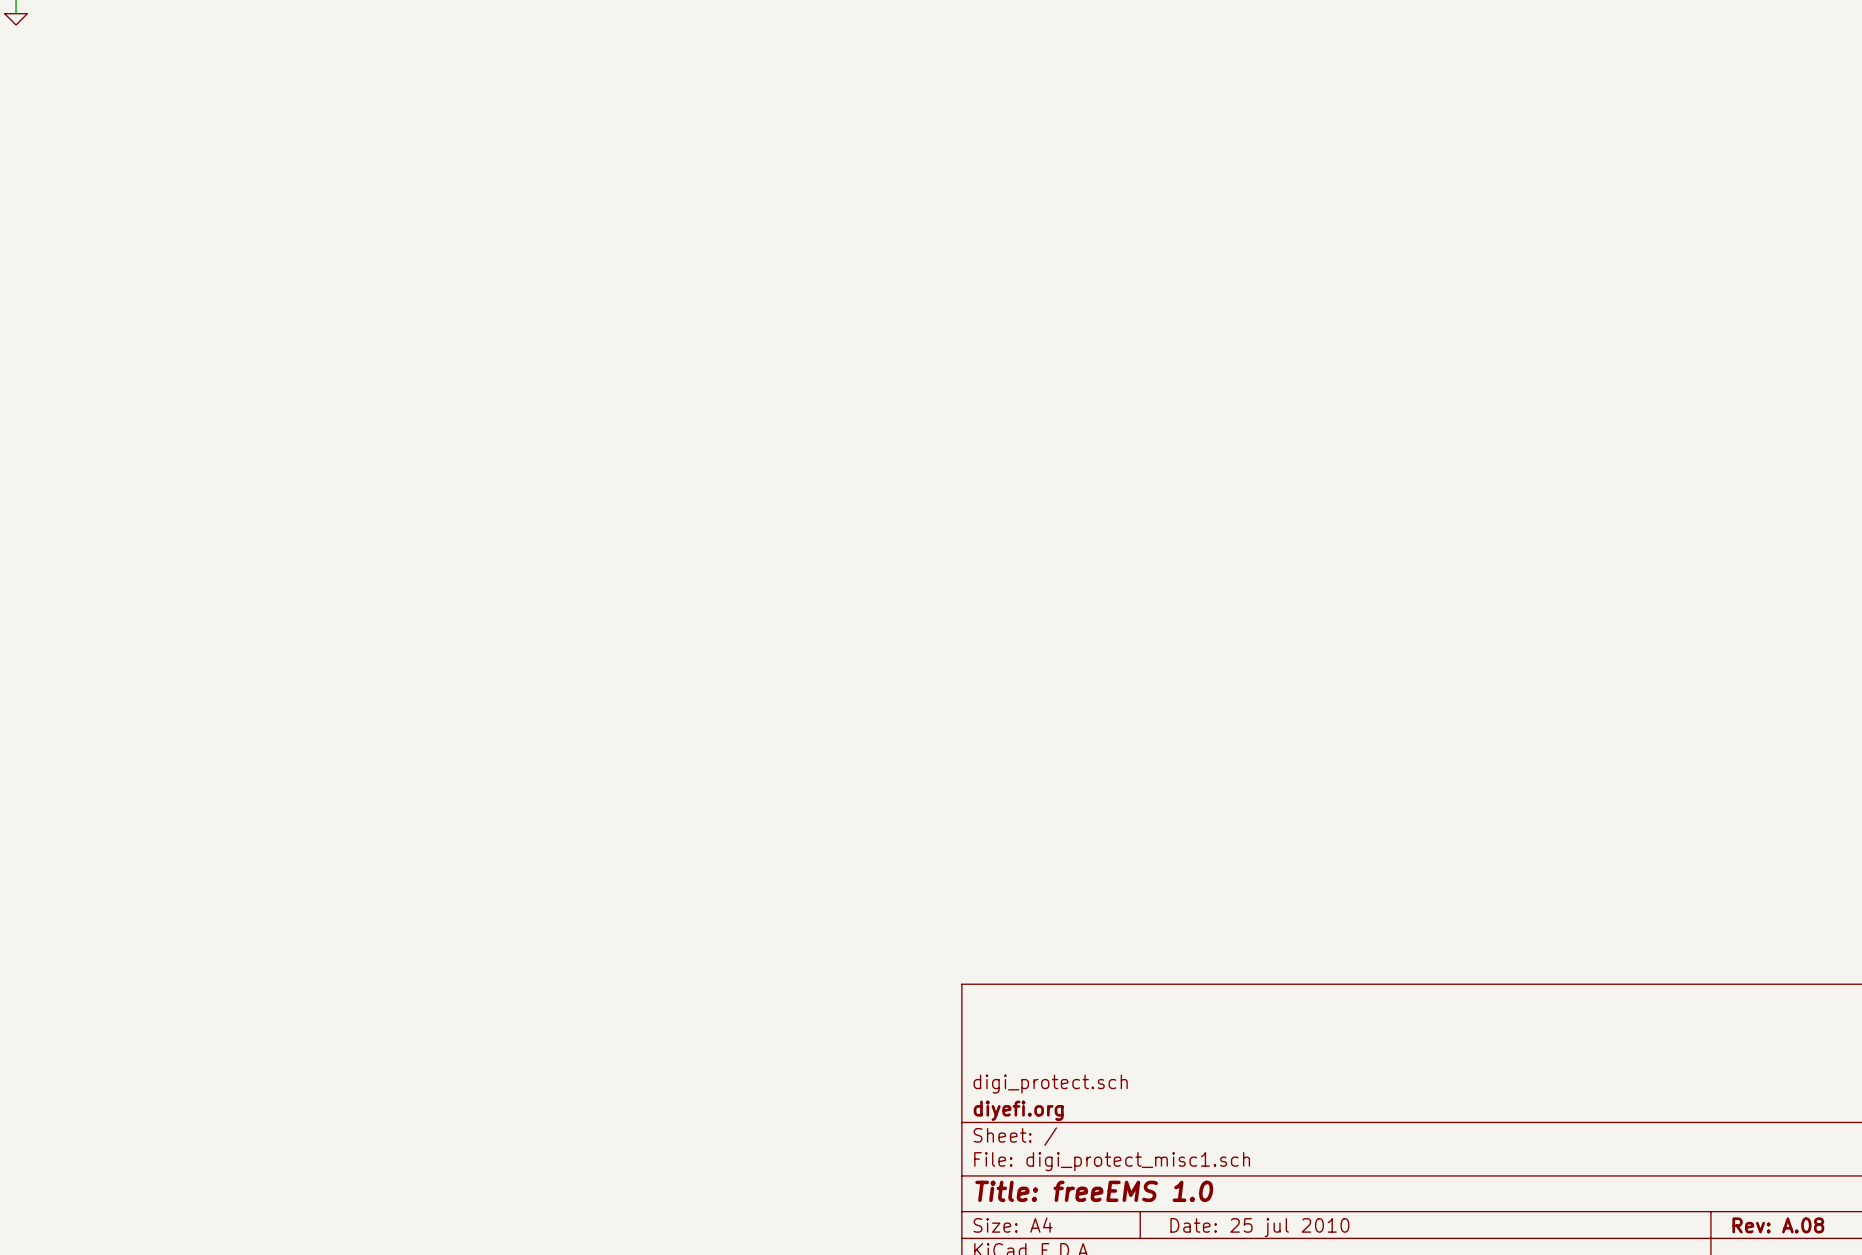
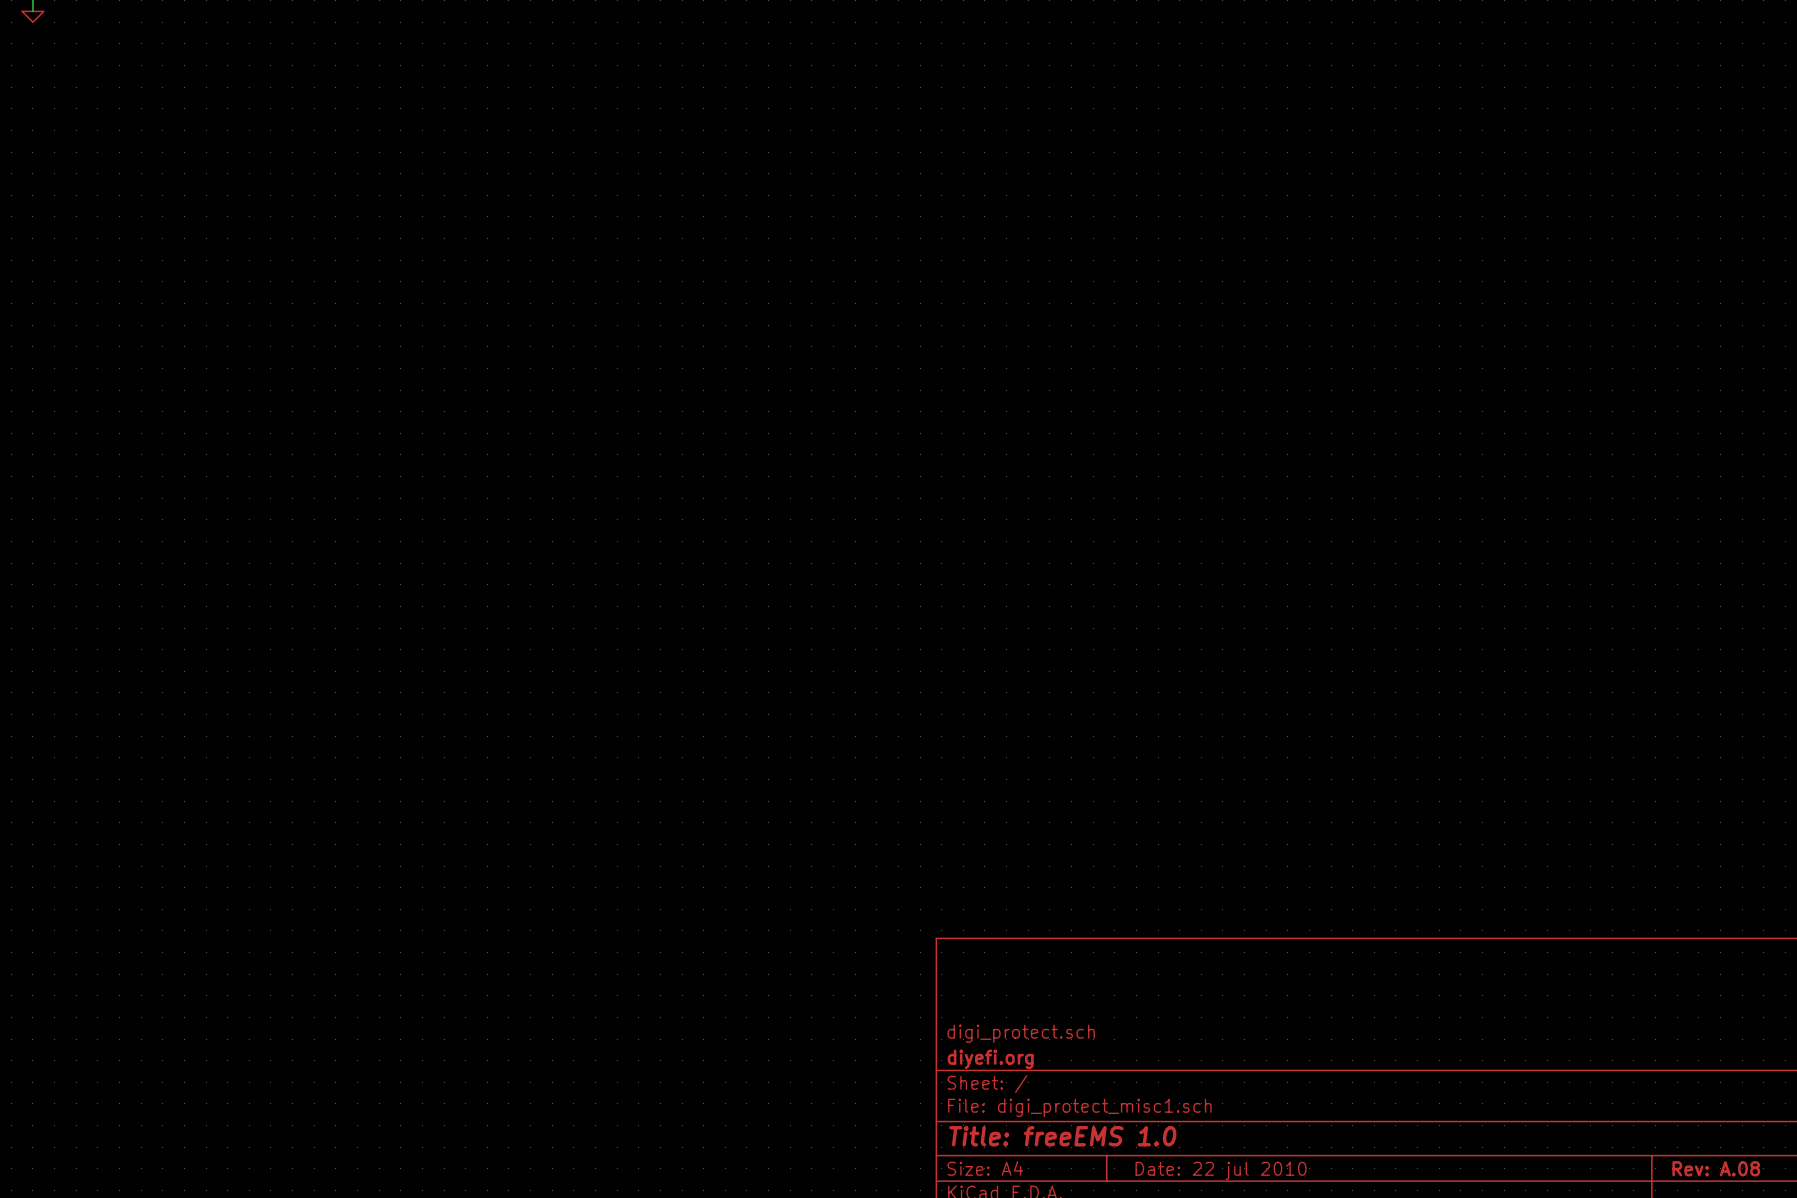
title block: Date: 25 jul 2010 (1259, 1227) -> Date: 22 jul 2010 (1221, 1170)

